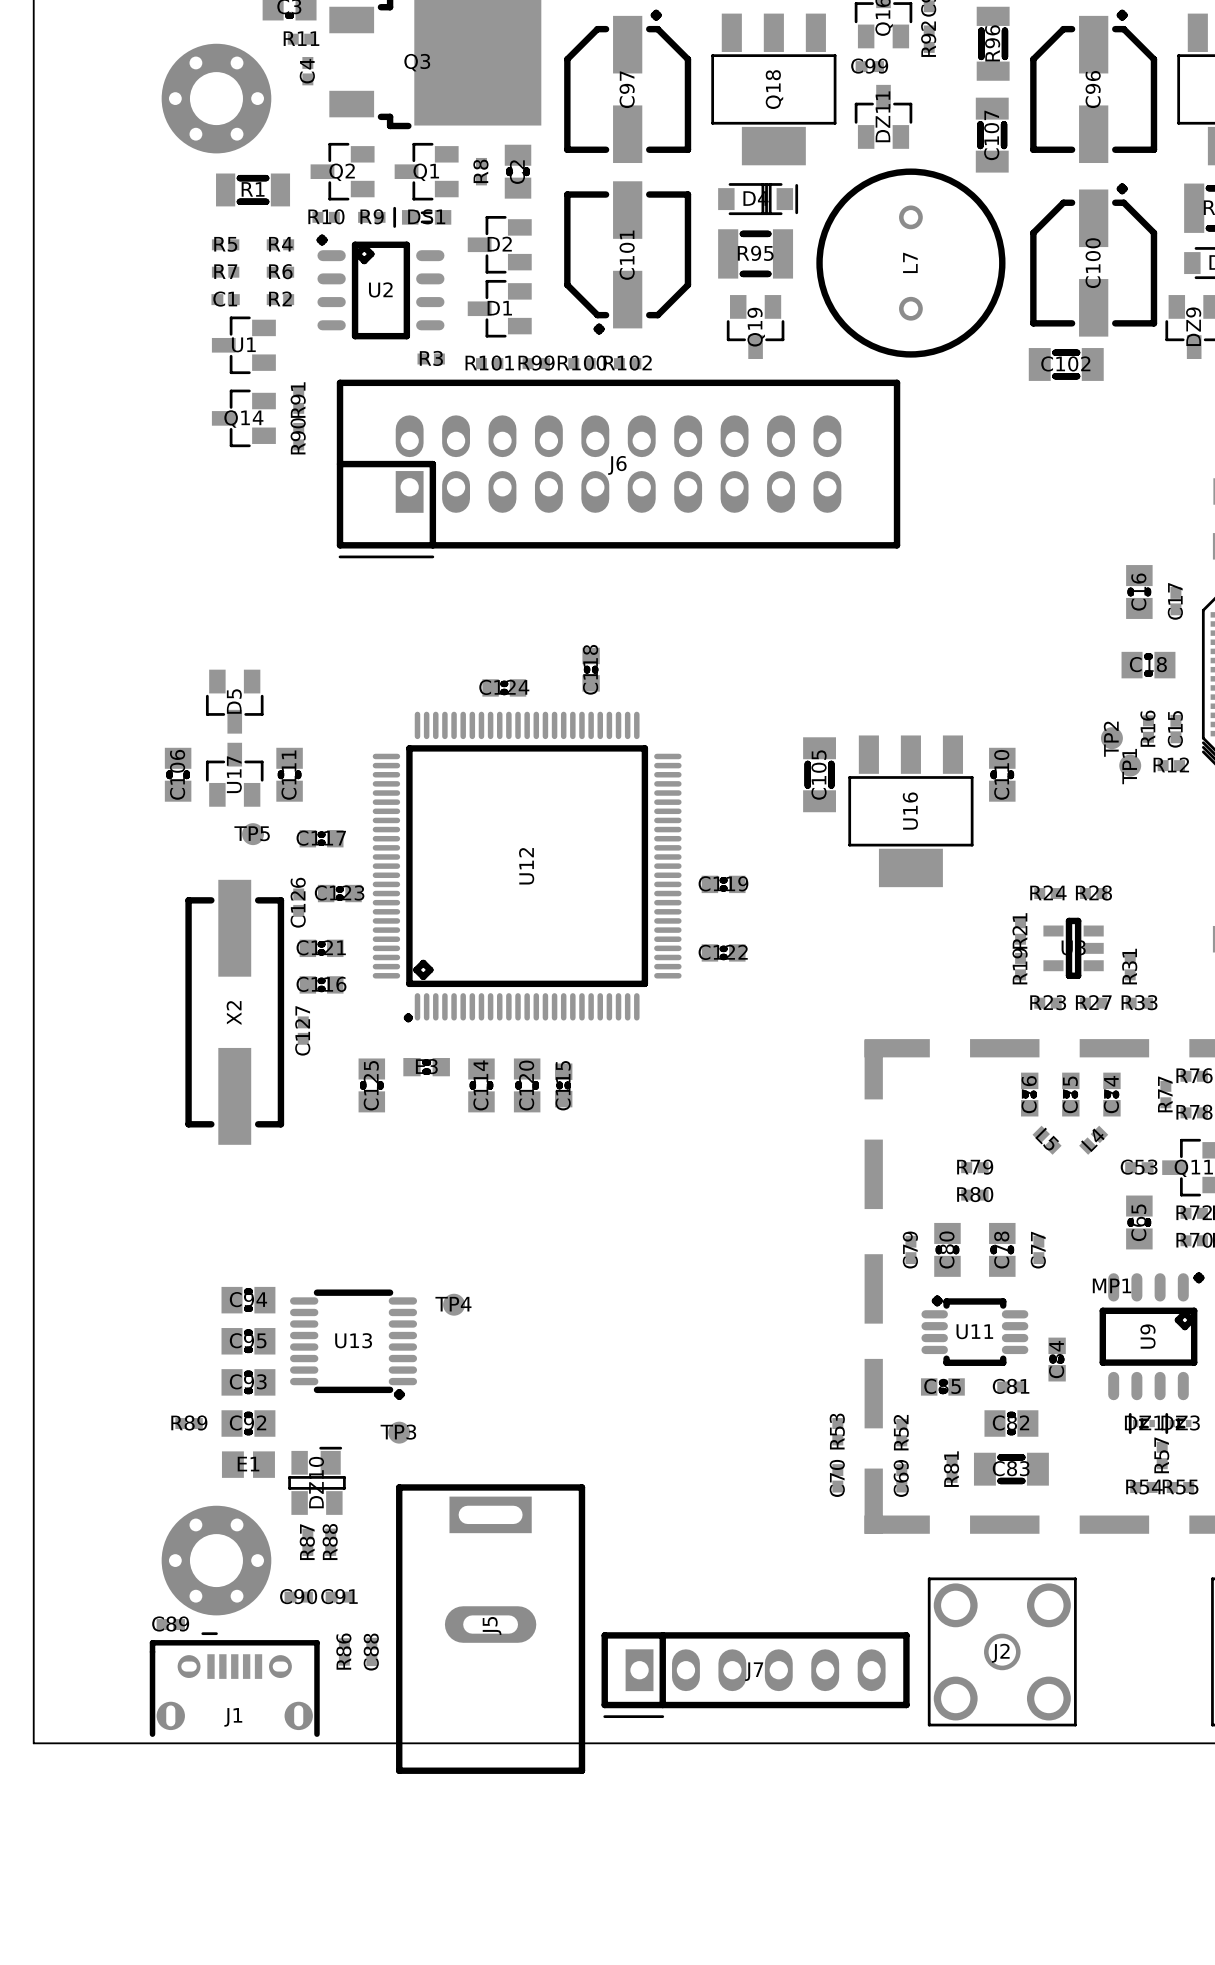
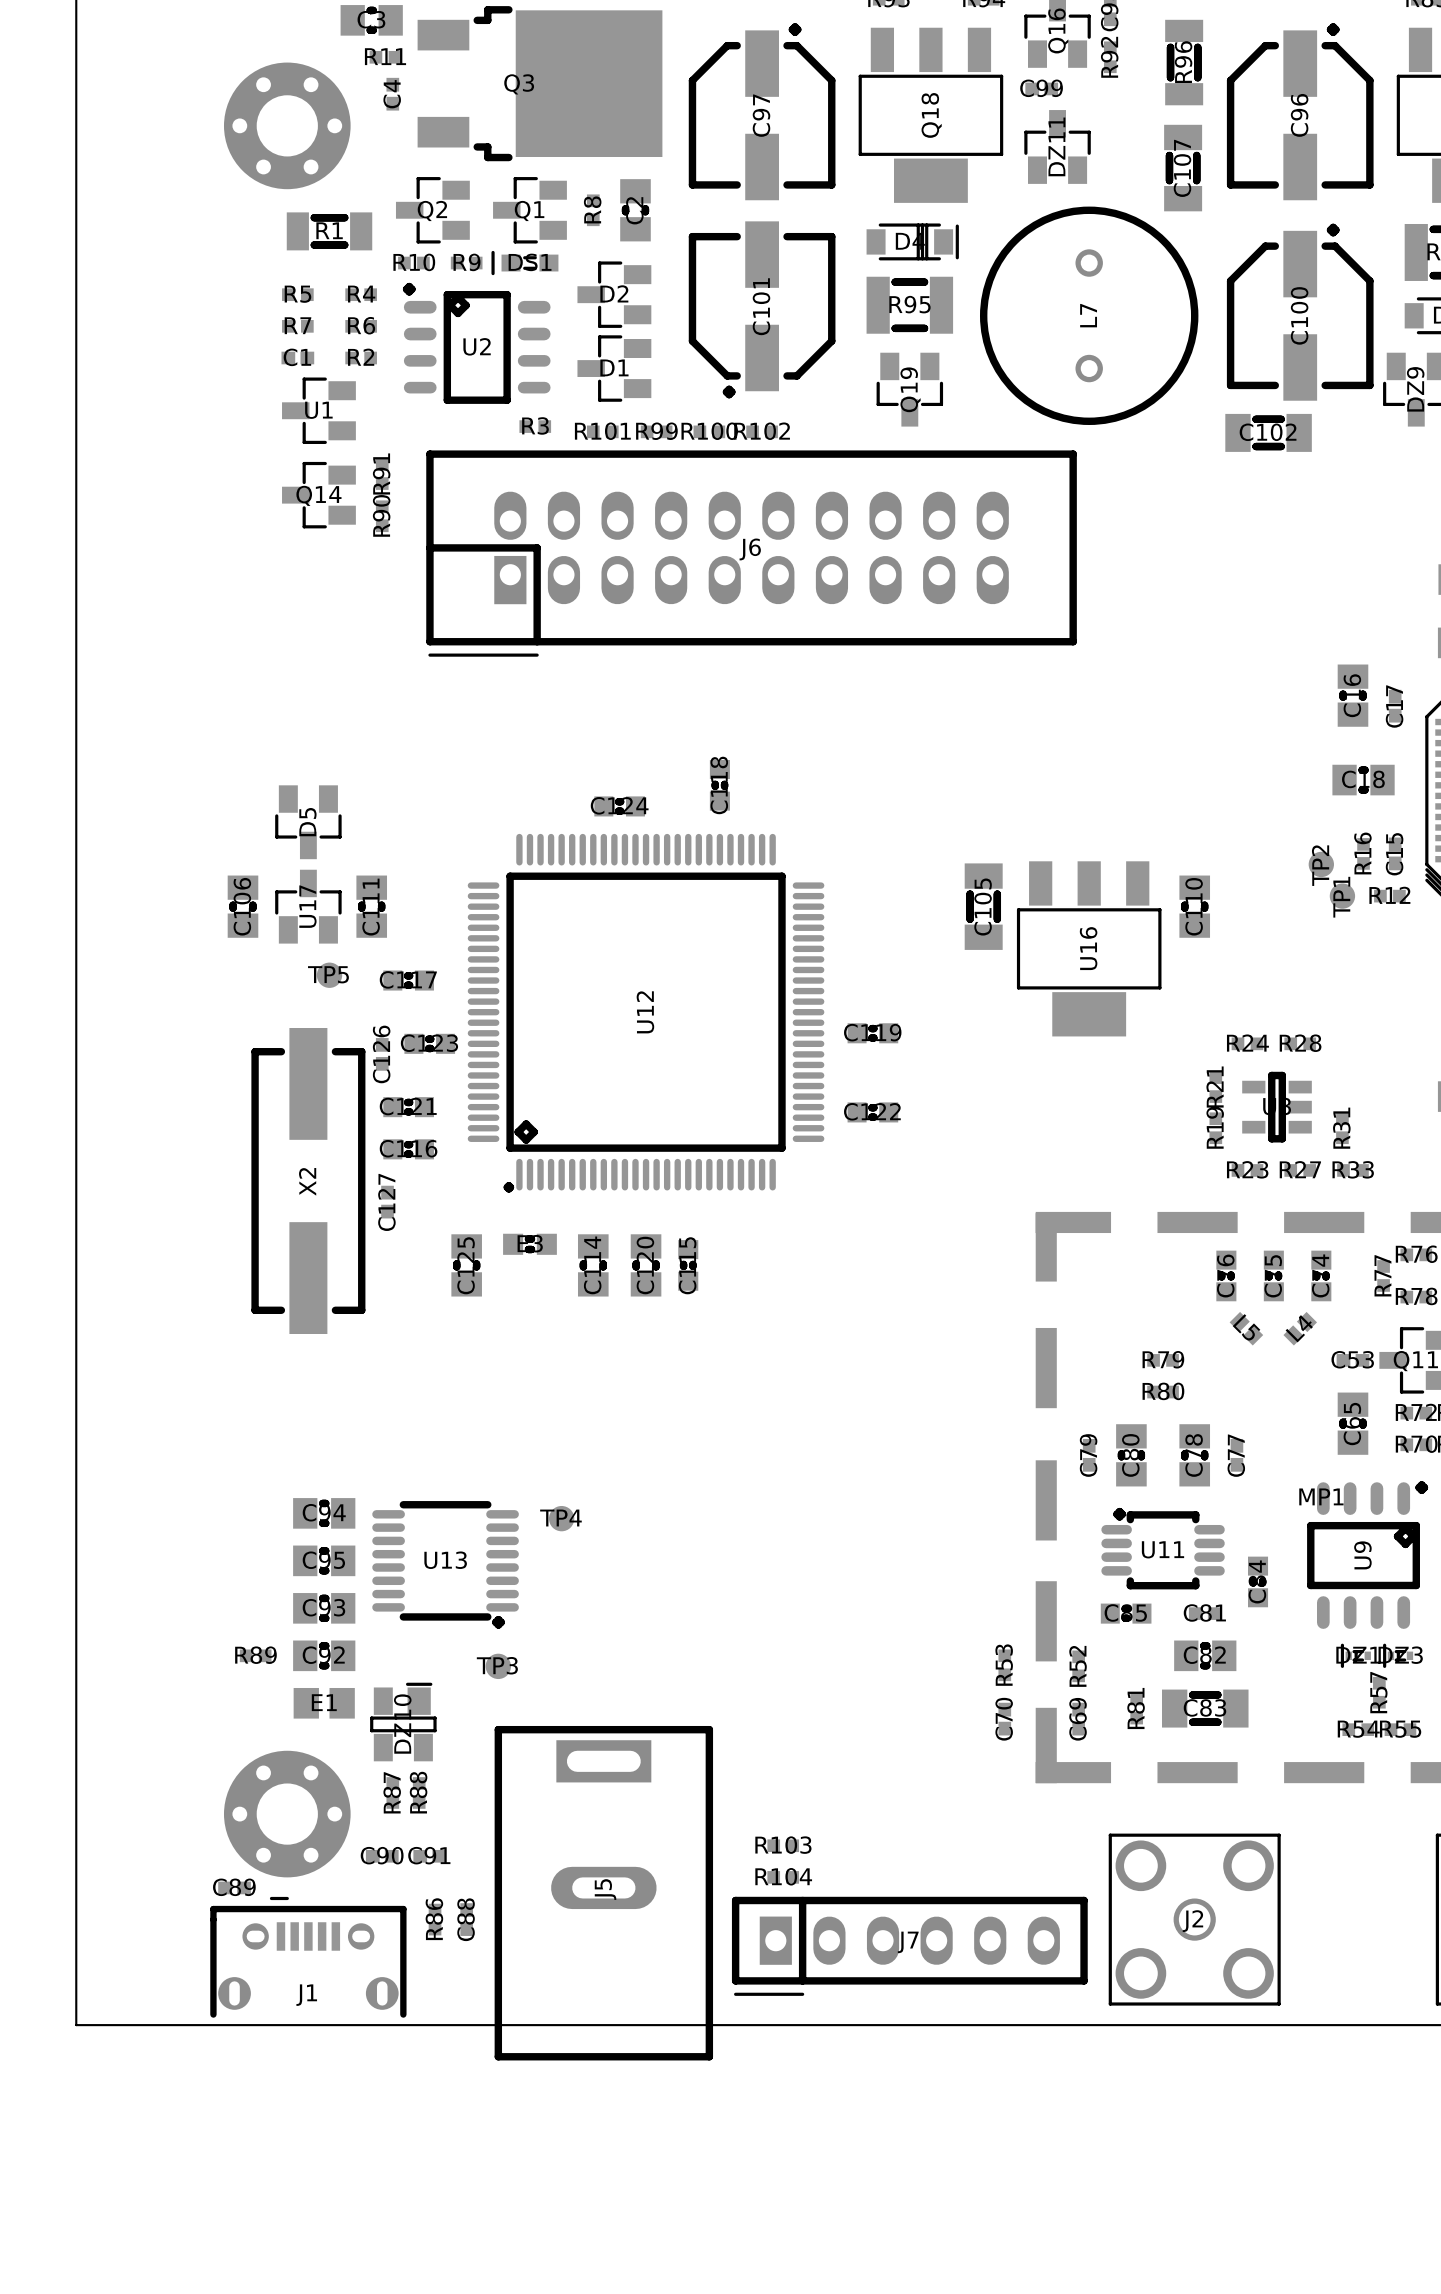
R103: none -> (783, 1845)
R104: none -> (783, 1877)

